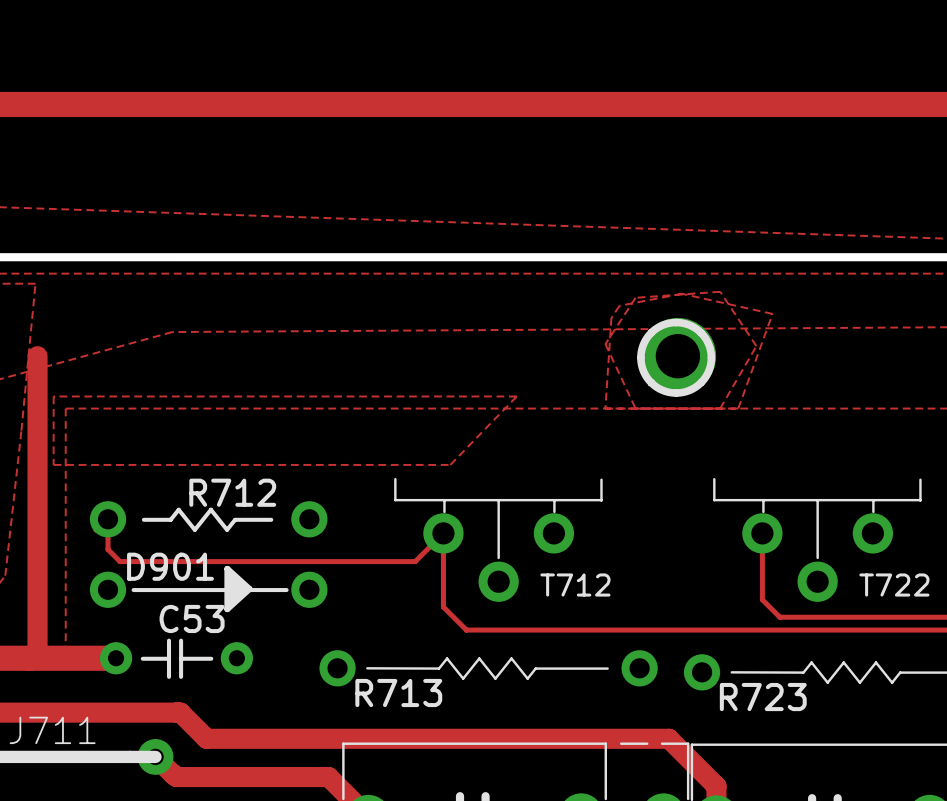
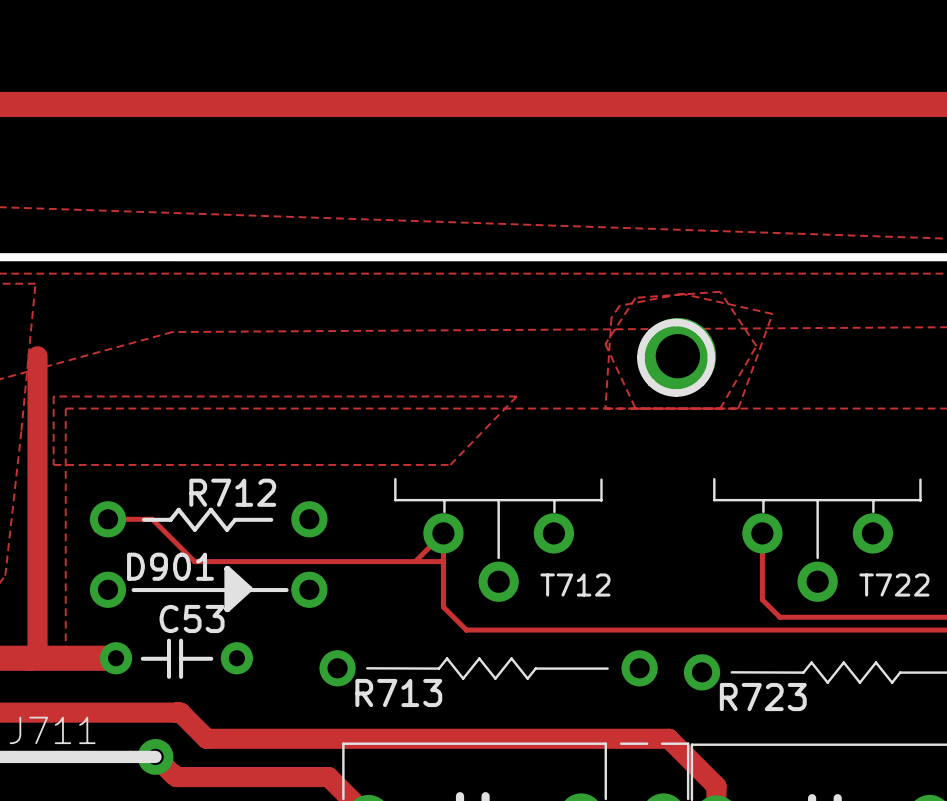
track: (108, 521) (108, 549) (120, 561) (194, 561) -> (108, 519) (152, 519) (194, 561)
track: none -> (415, 561) (443, 562)

